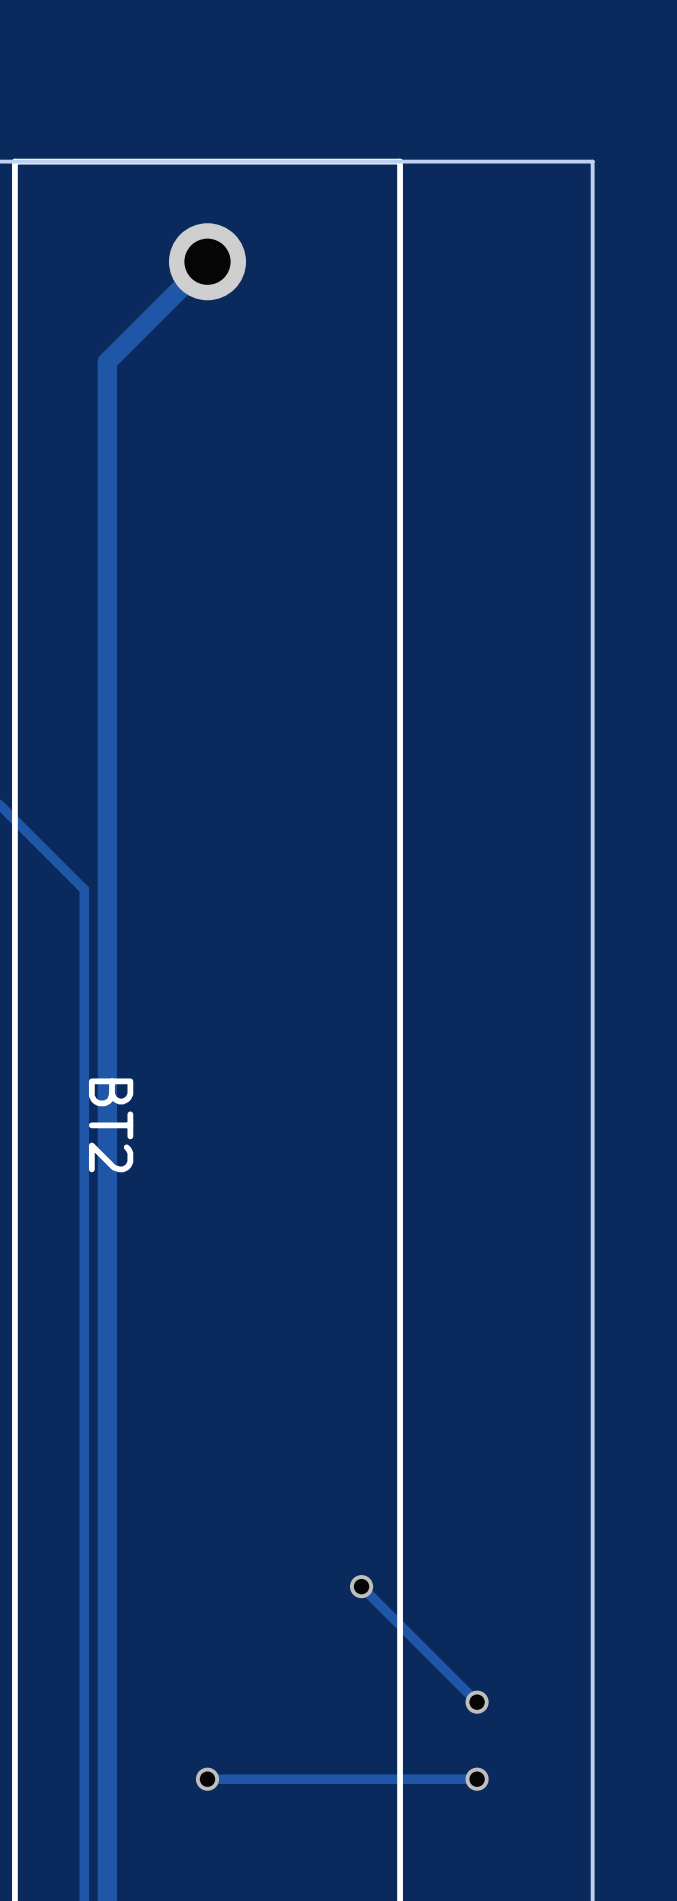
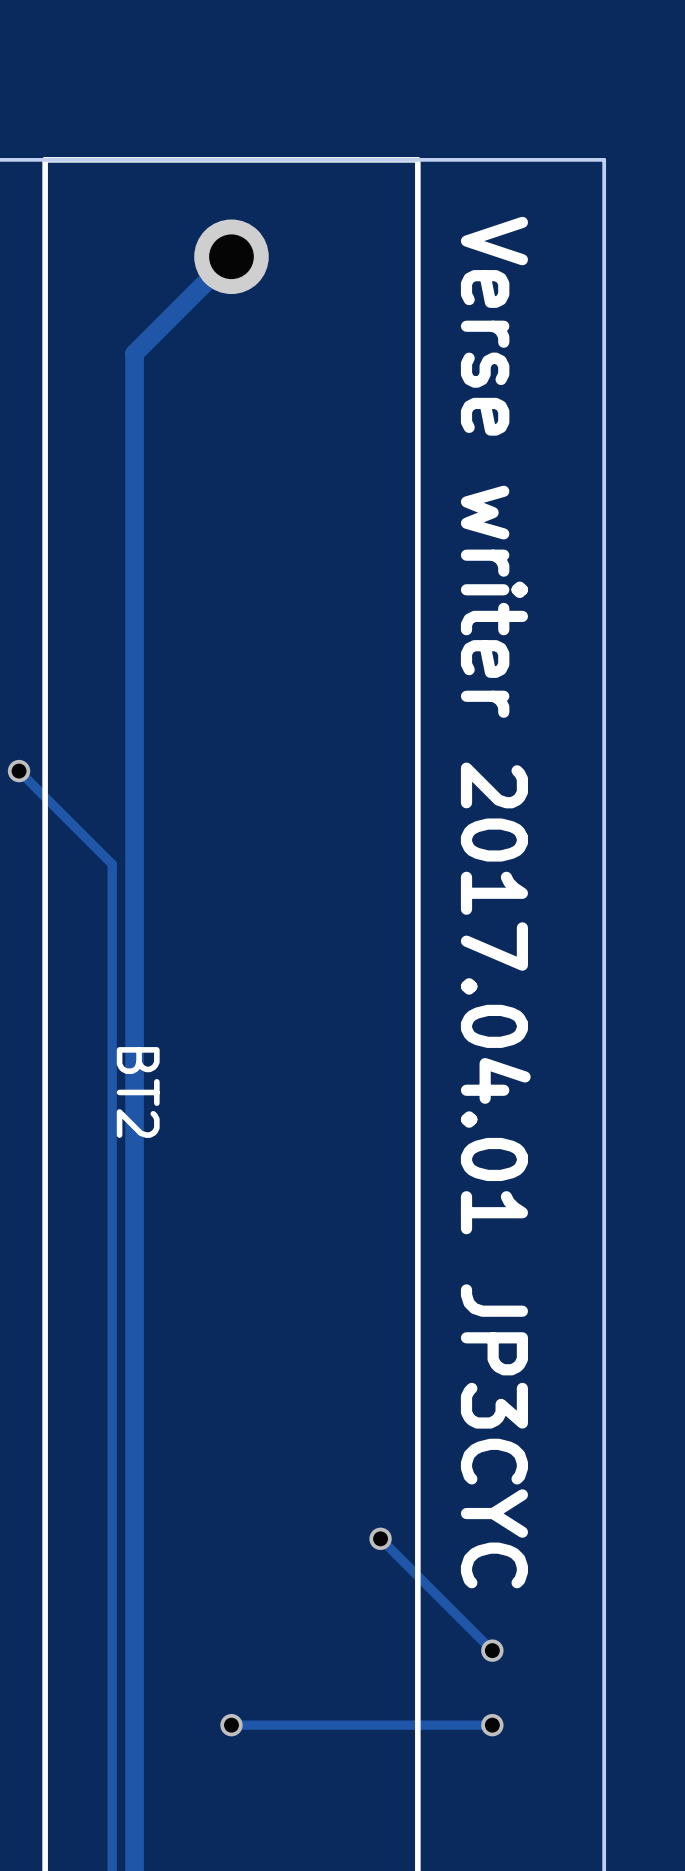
text: none -> Verse writer 2017.04.01 JP3CYC (495, 902)

